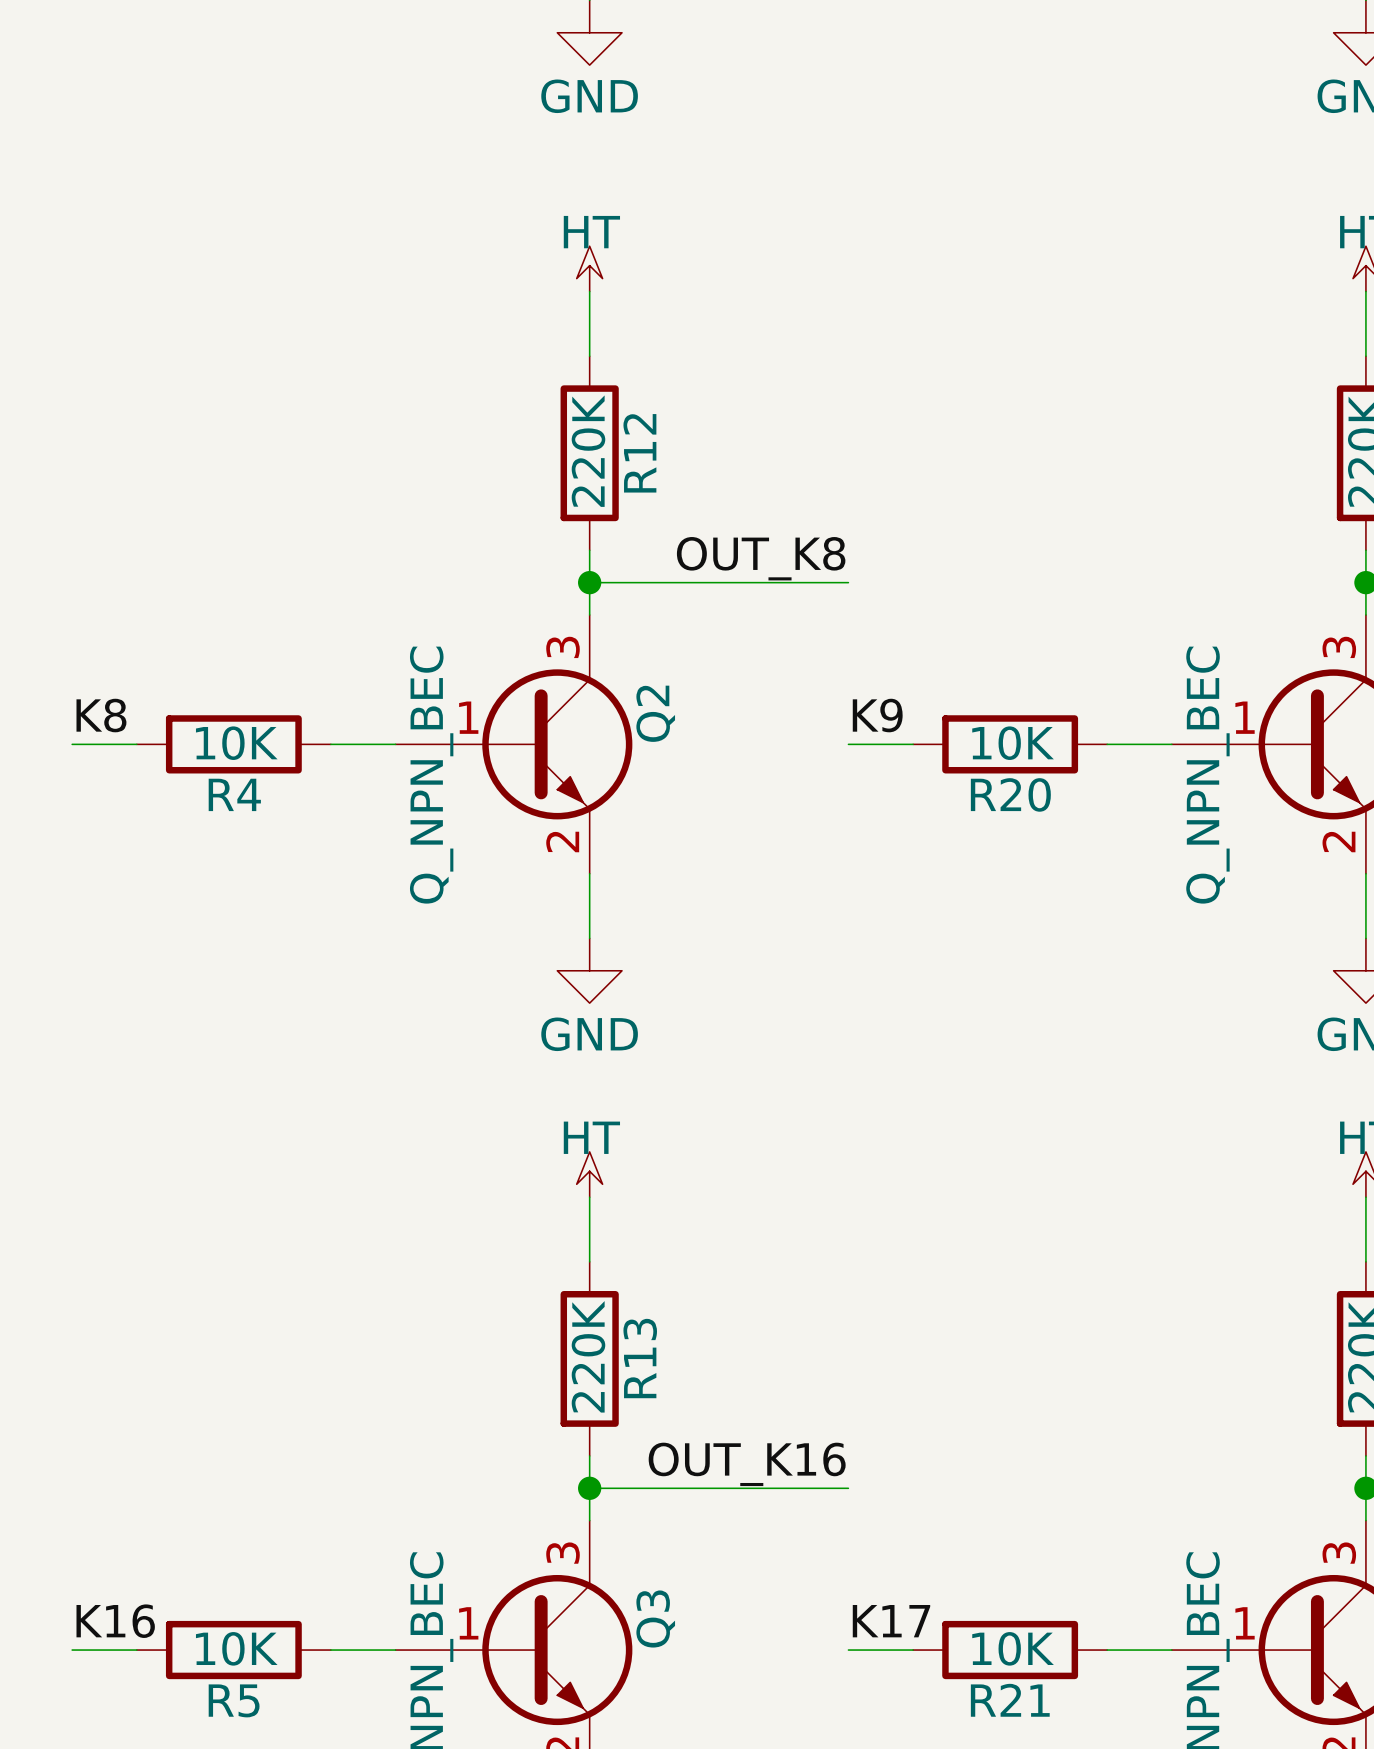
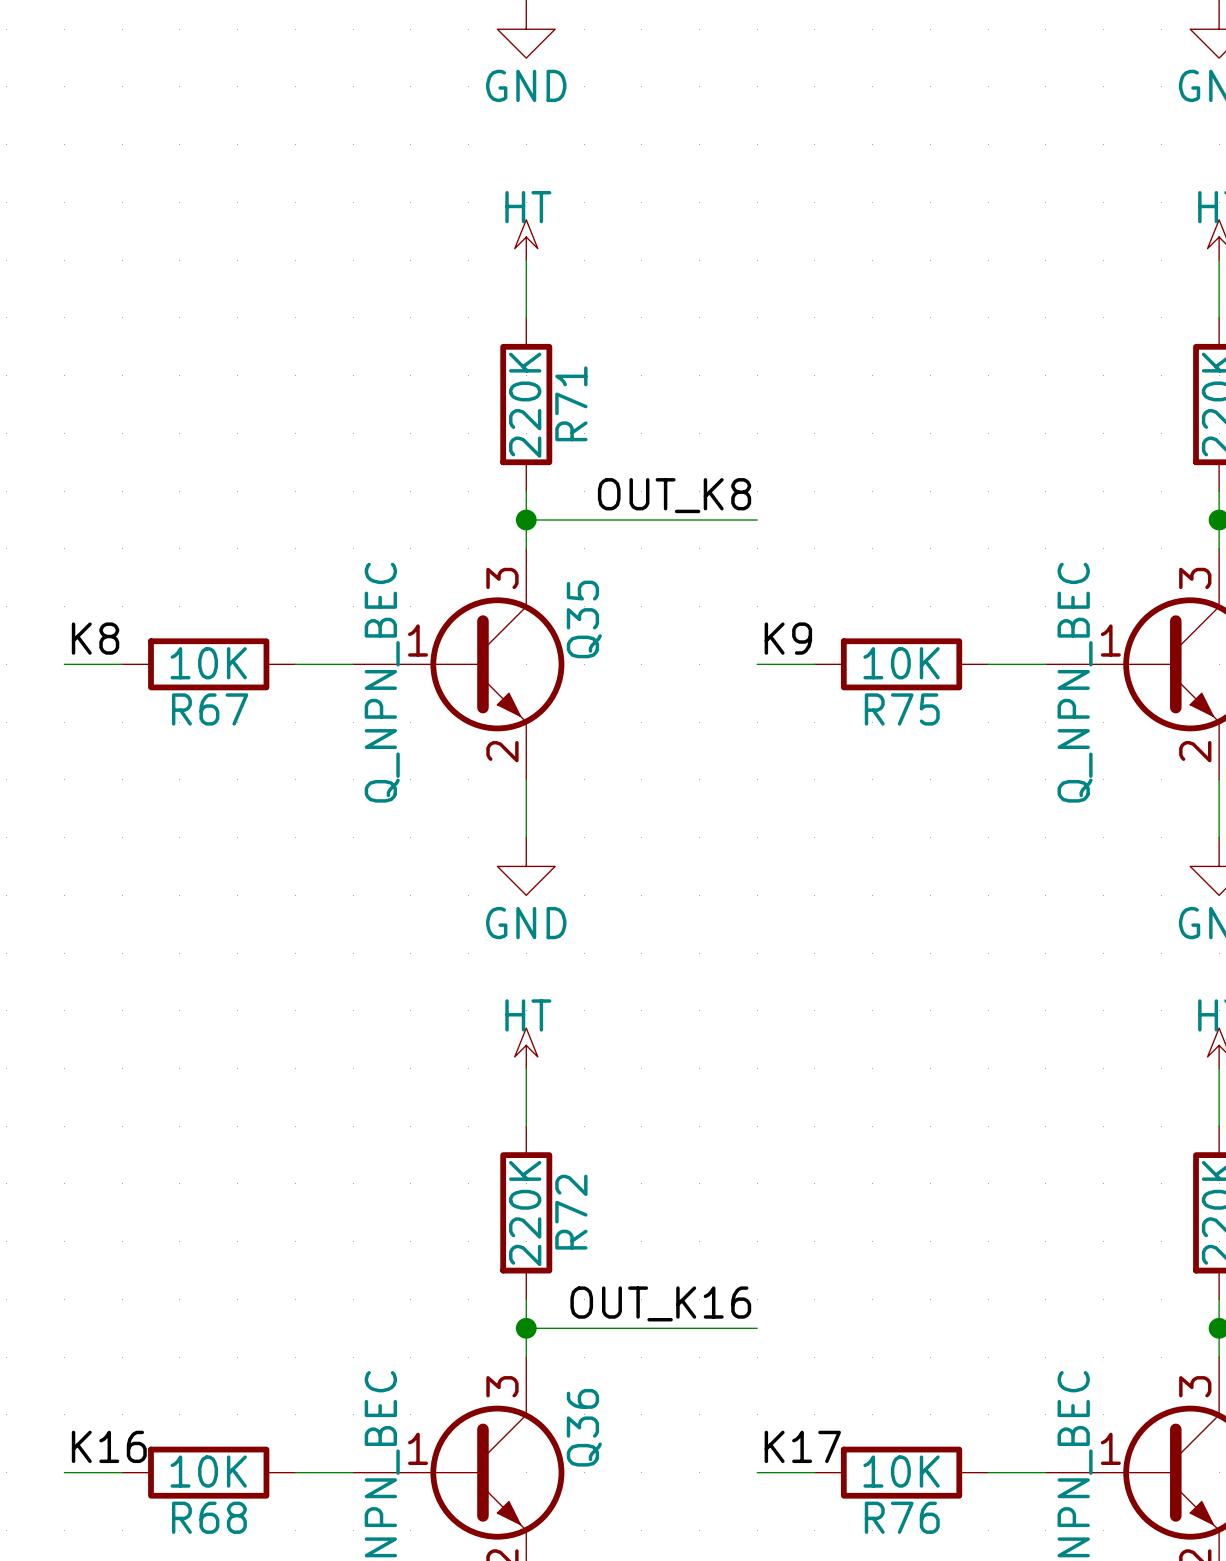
R12 name: R12 (639, 453) -> R71 (571, 403)
Q2 name: Q2 (655, 713) -> Q35 (584, 619)
R4 name: R4 (234, 794) -> R67 (210, 709)
R20 name: R20 (1010, 794) -> R75 (902, 709)
R13 name: R13 (640, 1358) -> R72 (571, 1212)
Q3 name: Q3 (655, 1618) -> Q36 (584, 1427)
R5 name: R5 (234, 1700) -> R68 (209, 1517)
R21 name: R21 (1010, 1700) -> R76 (902, 1517)

